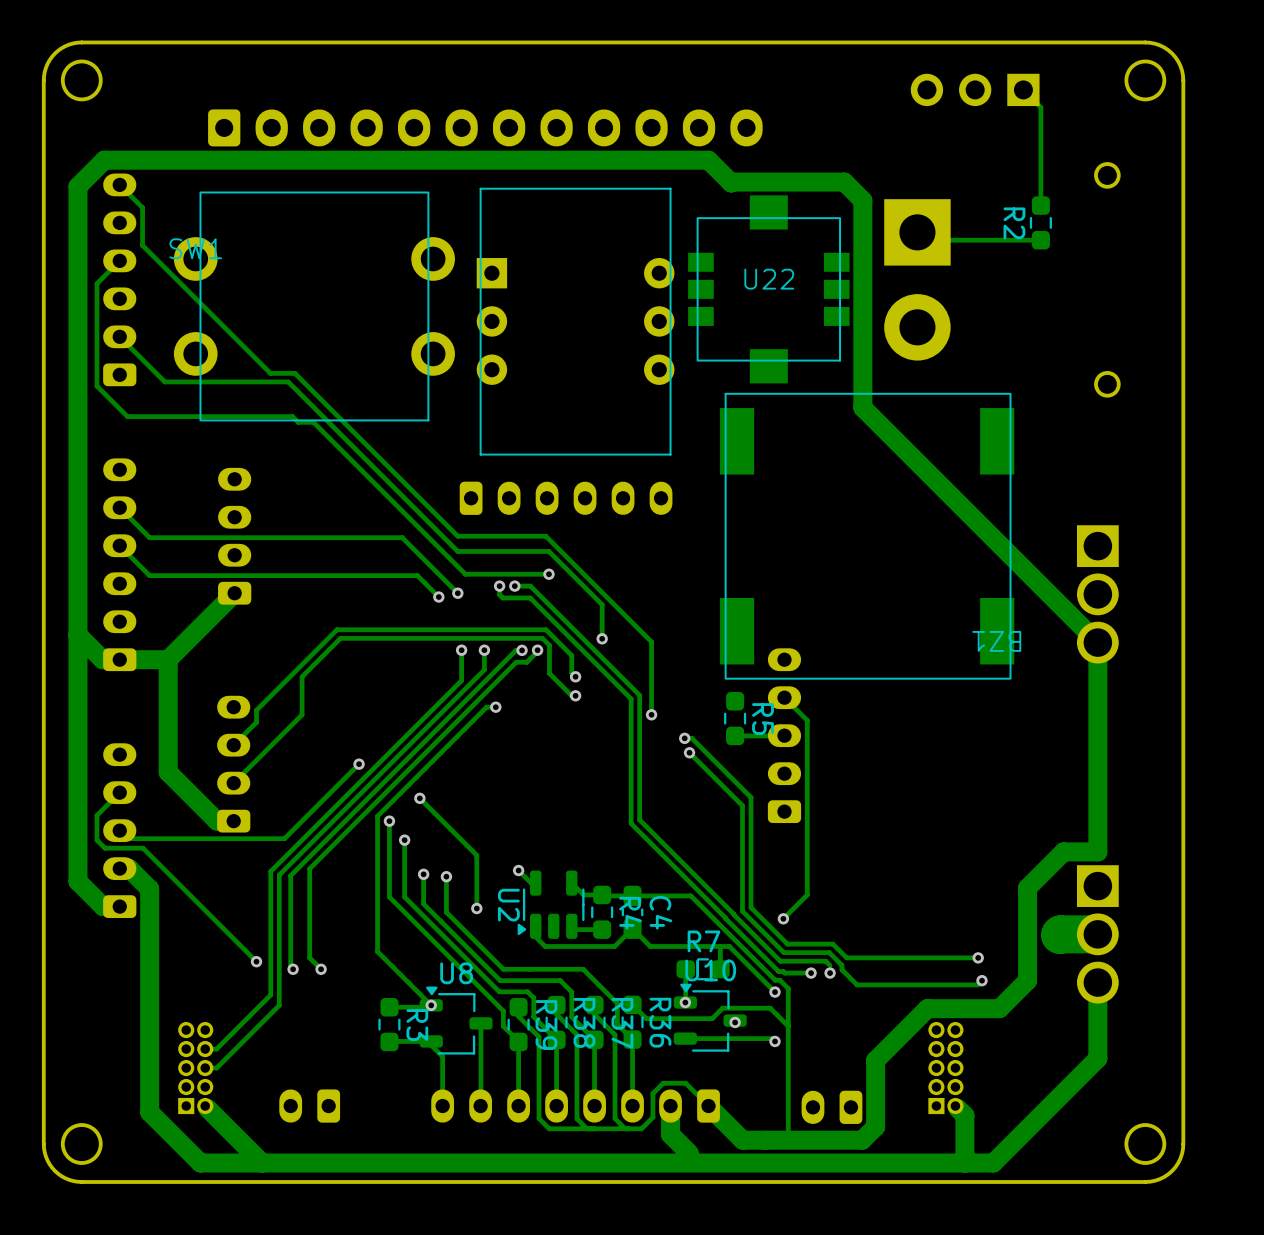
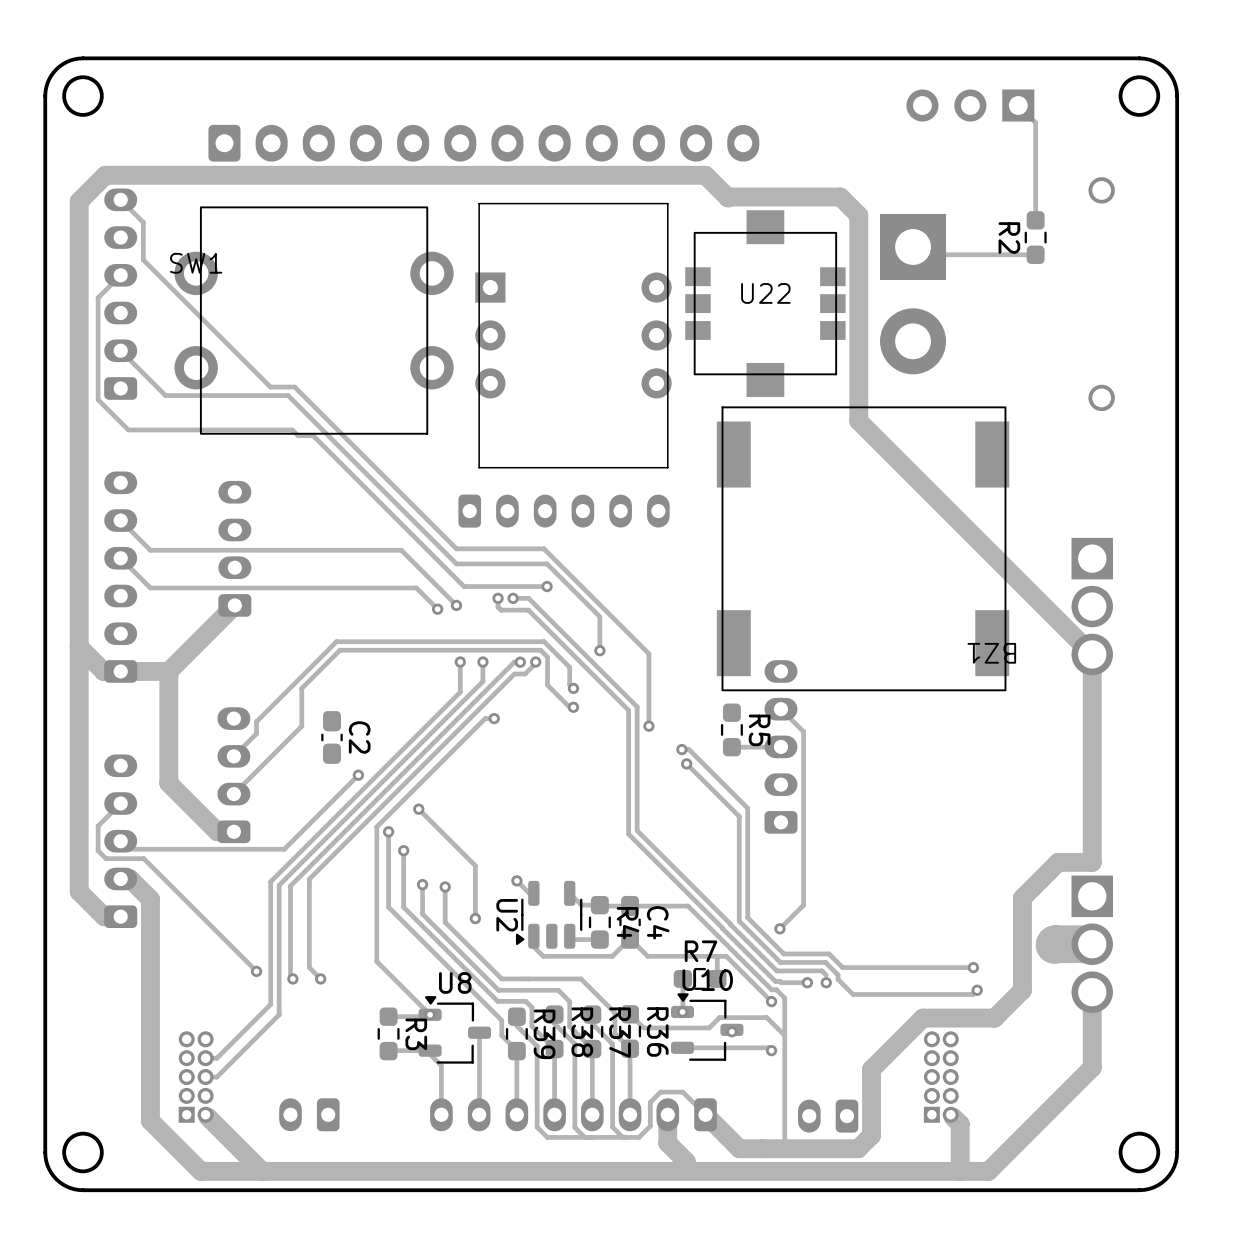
C2: none -> (332, 737)

